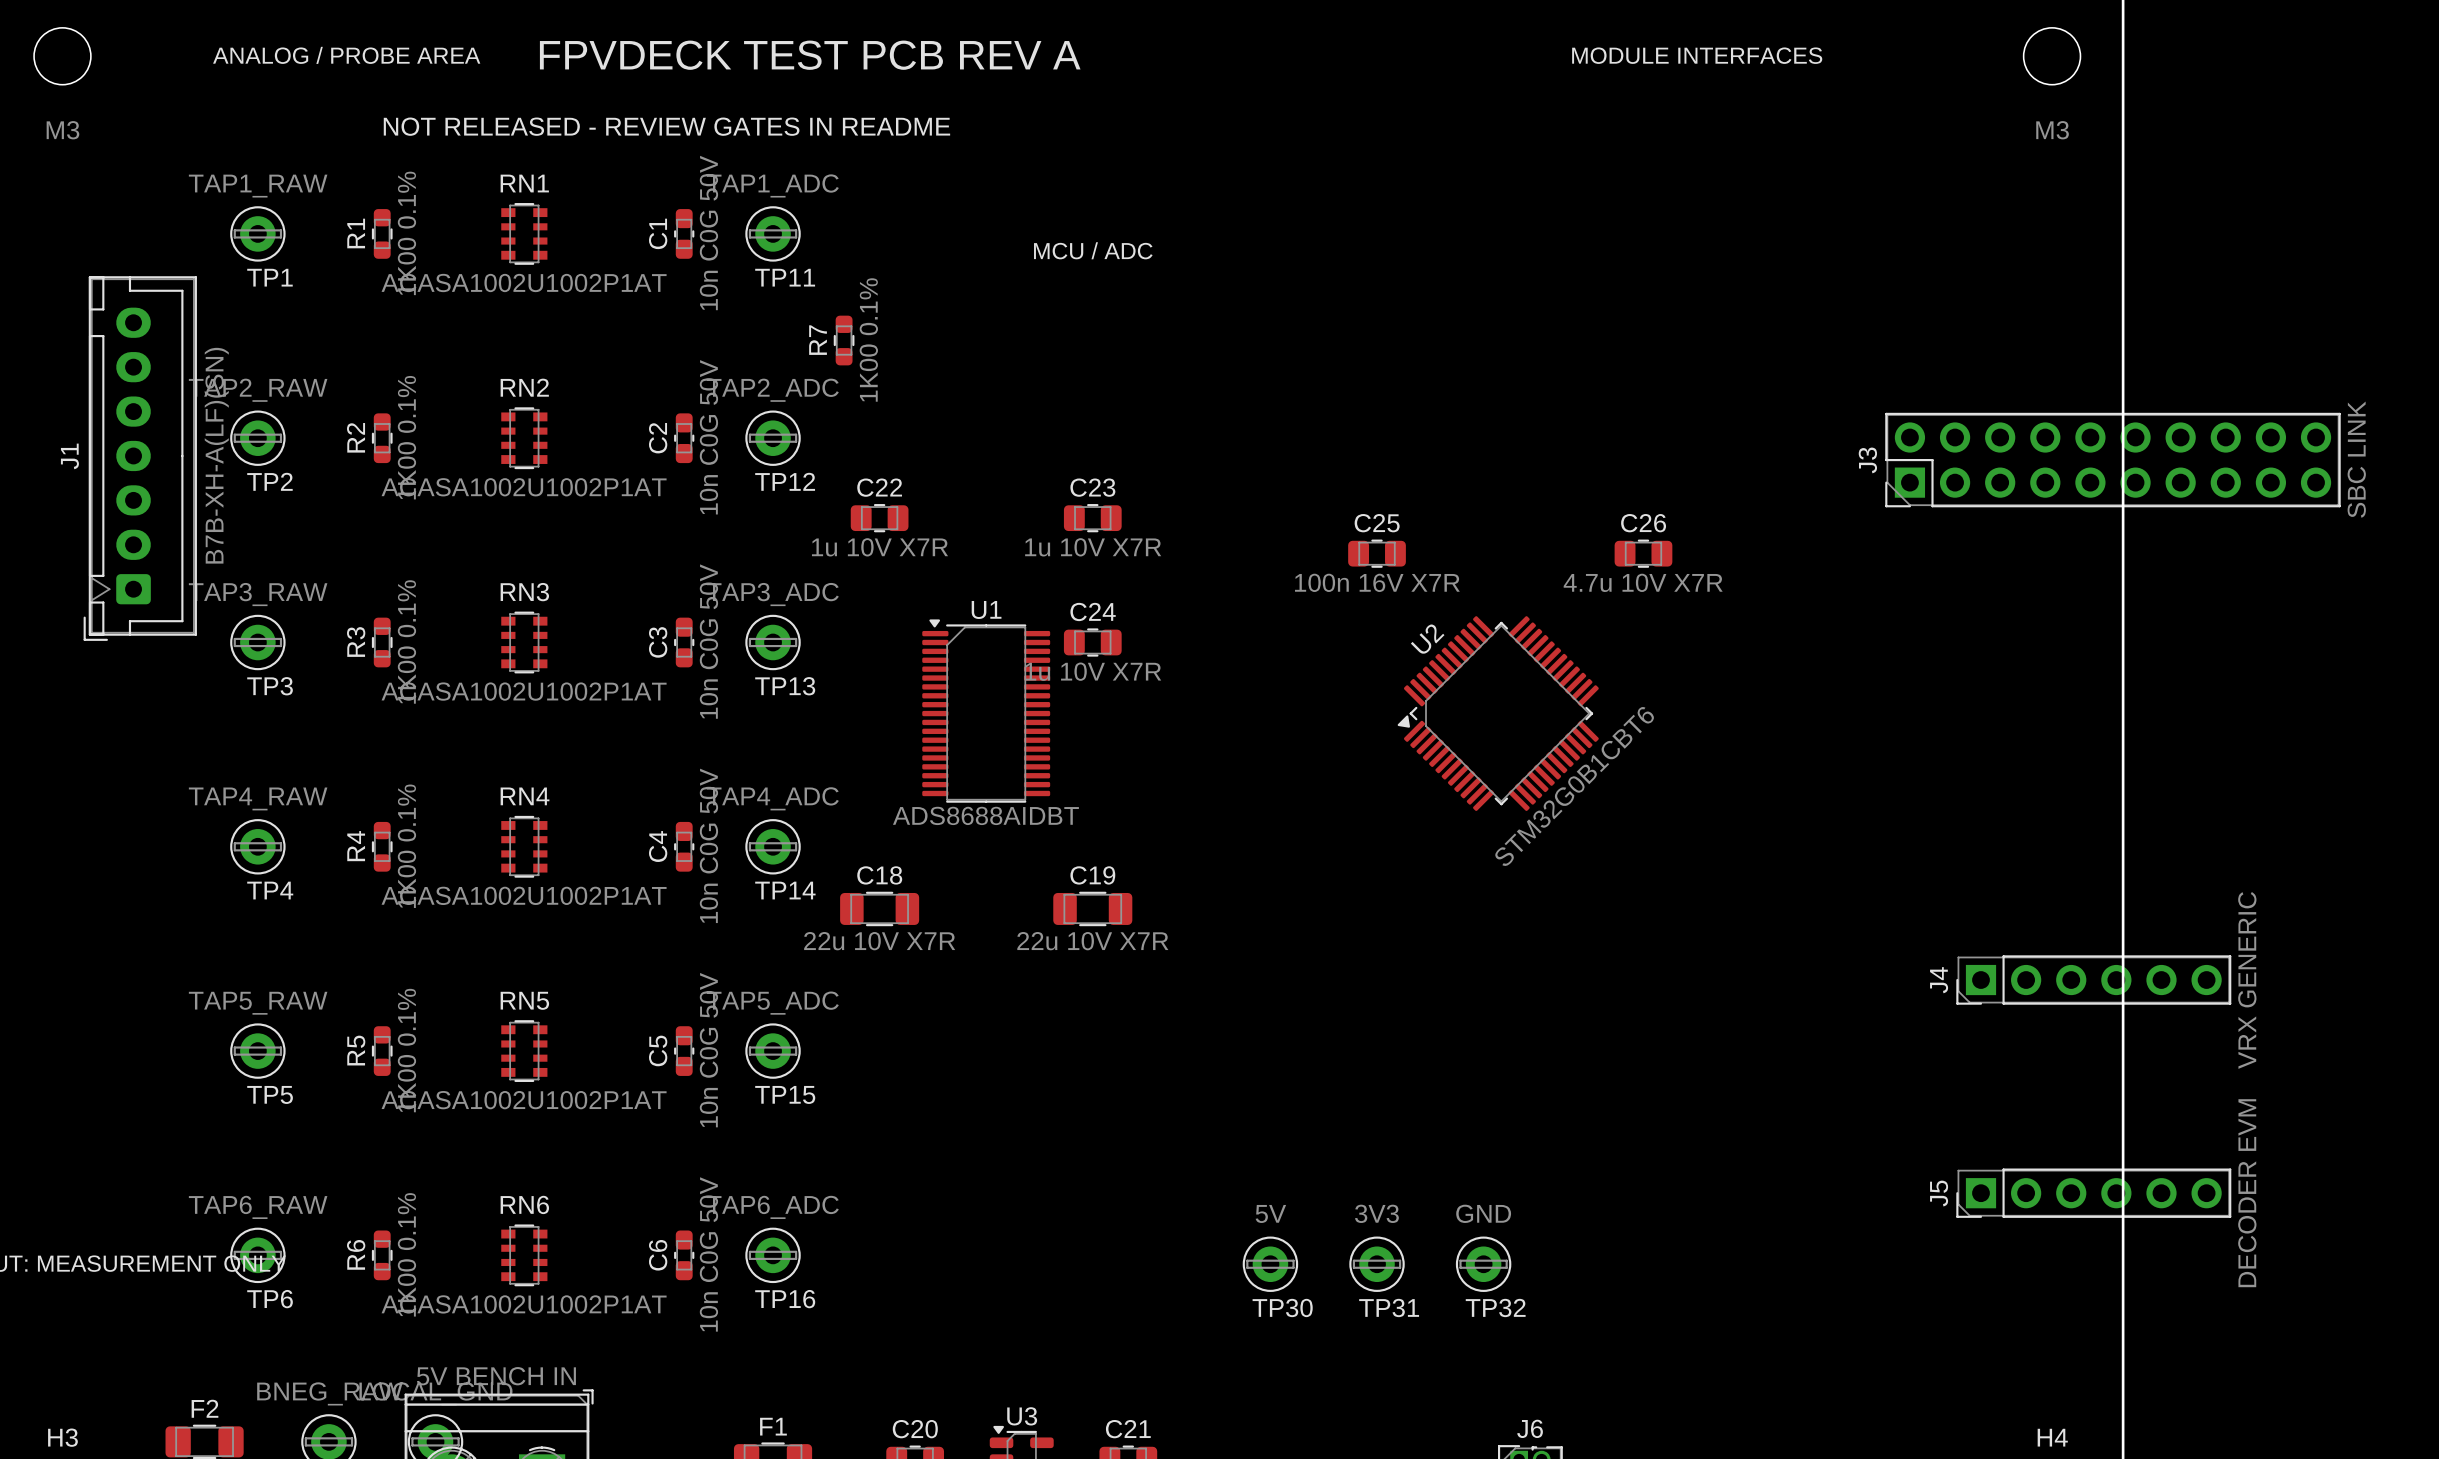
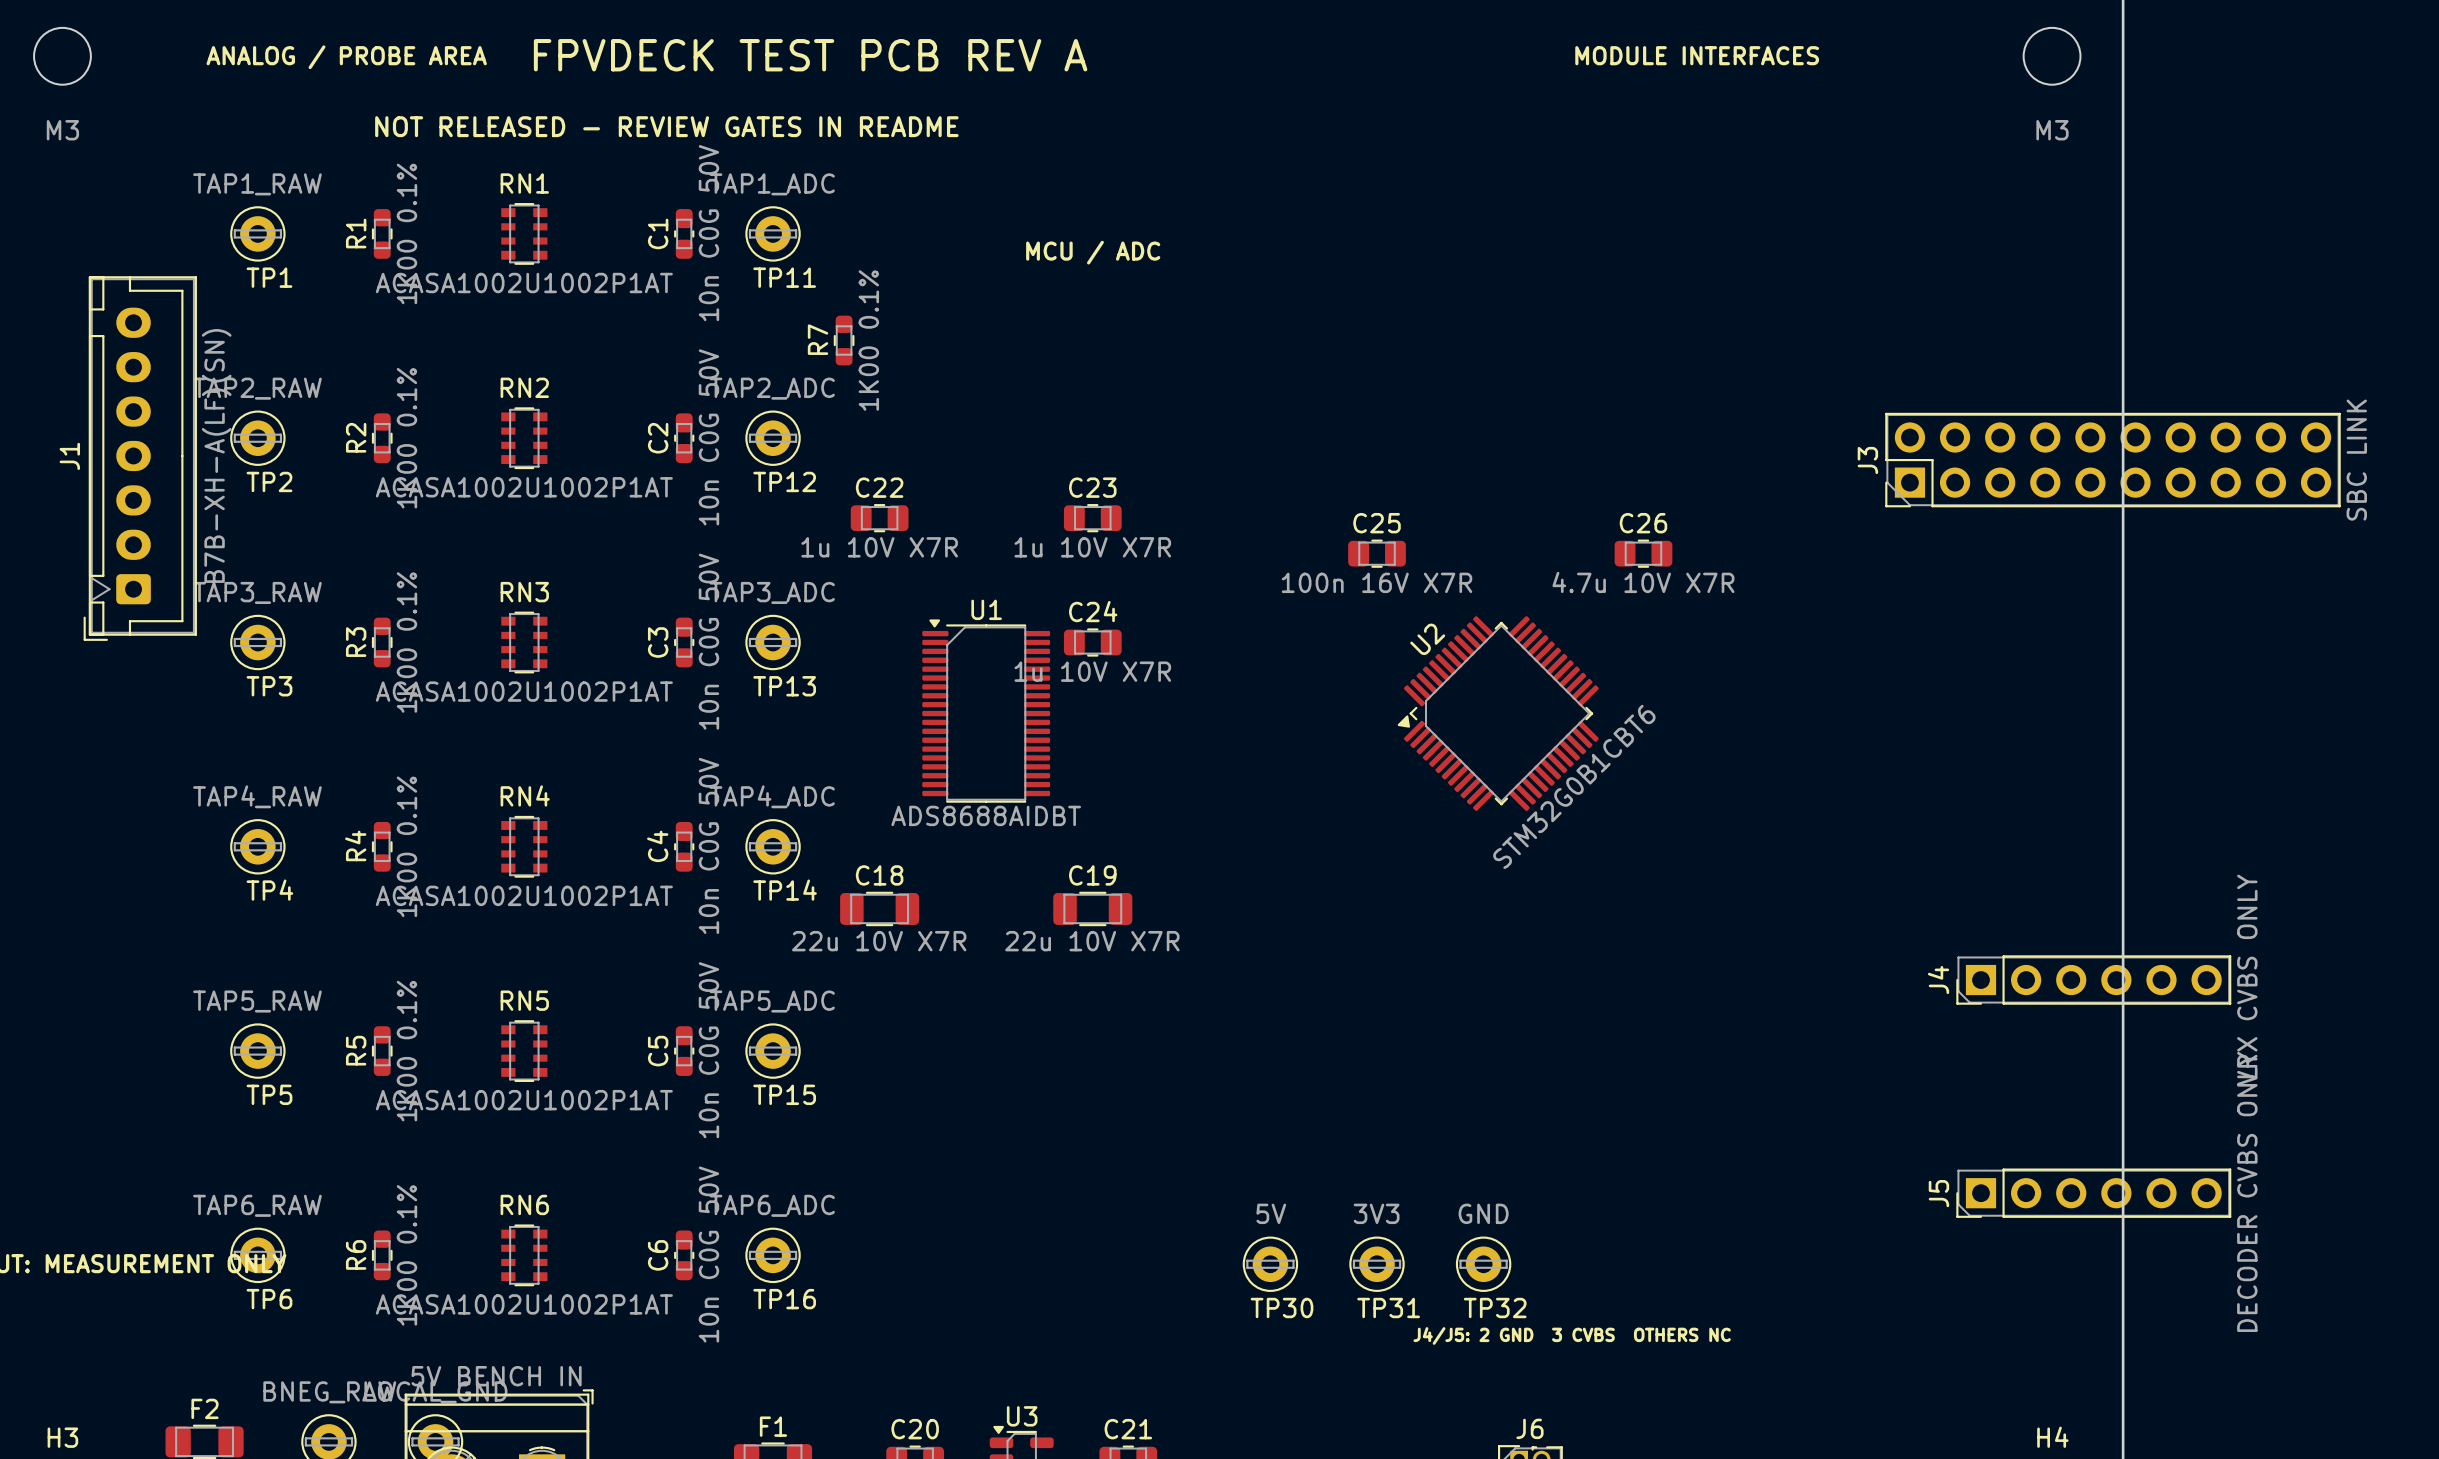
J4 value: VRX GENERIC (2247, 980) -> VRX CVBS ONLY (2247, 980)
J5 value: DECODER EVM (2247, 1193) -> DECODER CVBS ONLY (2247, 1191)
text: none -> J4/J5: 2 GND 3 CVBS OTHERS NC (1572, 1335)

